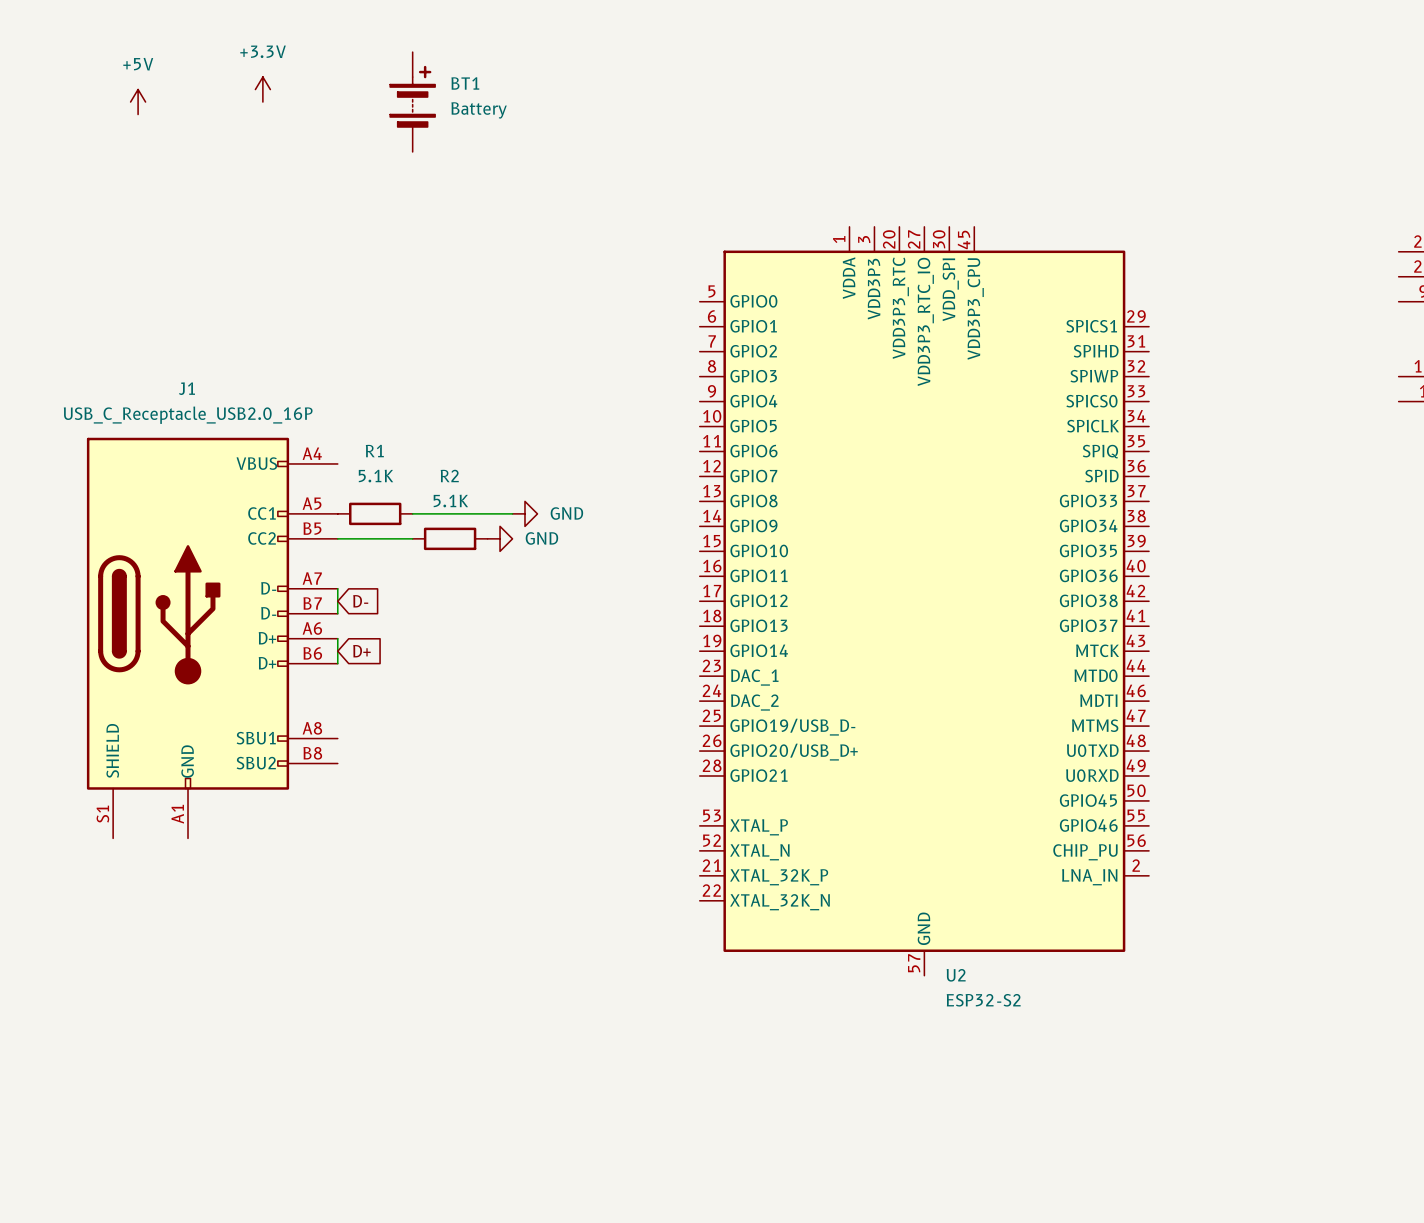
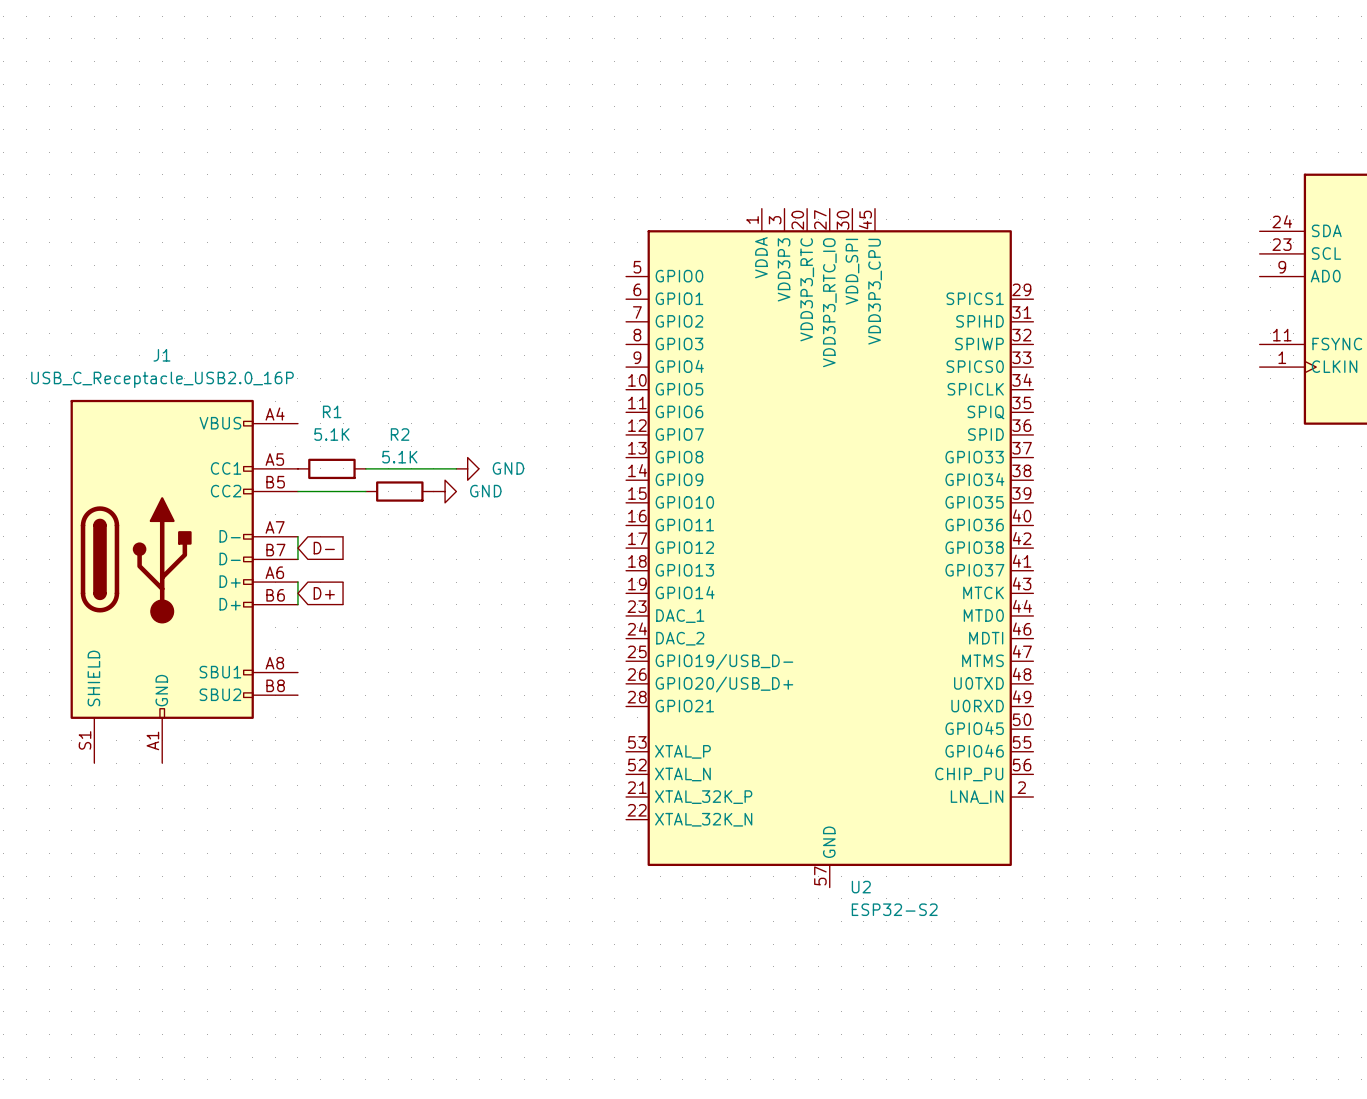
power symbol: +3.3V (262, 89) -> none
power symbol: +5V (138, 102) -> none
BT1: Battery (412, 102) -> none

